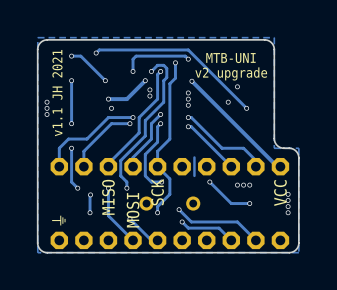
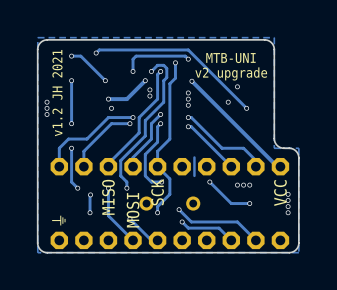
text: v1.1 JH 2021 (57, 93) -> v1.2 JH 2021 (57, 93)

